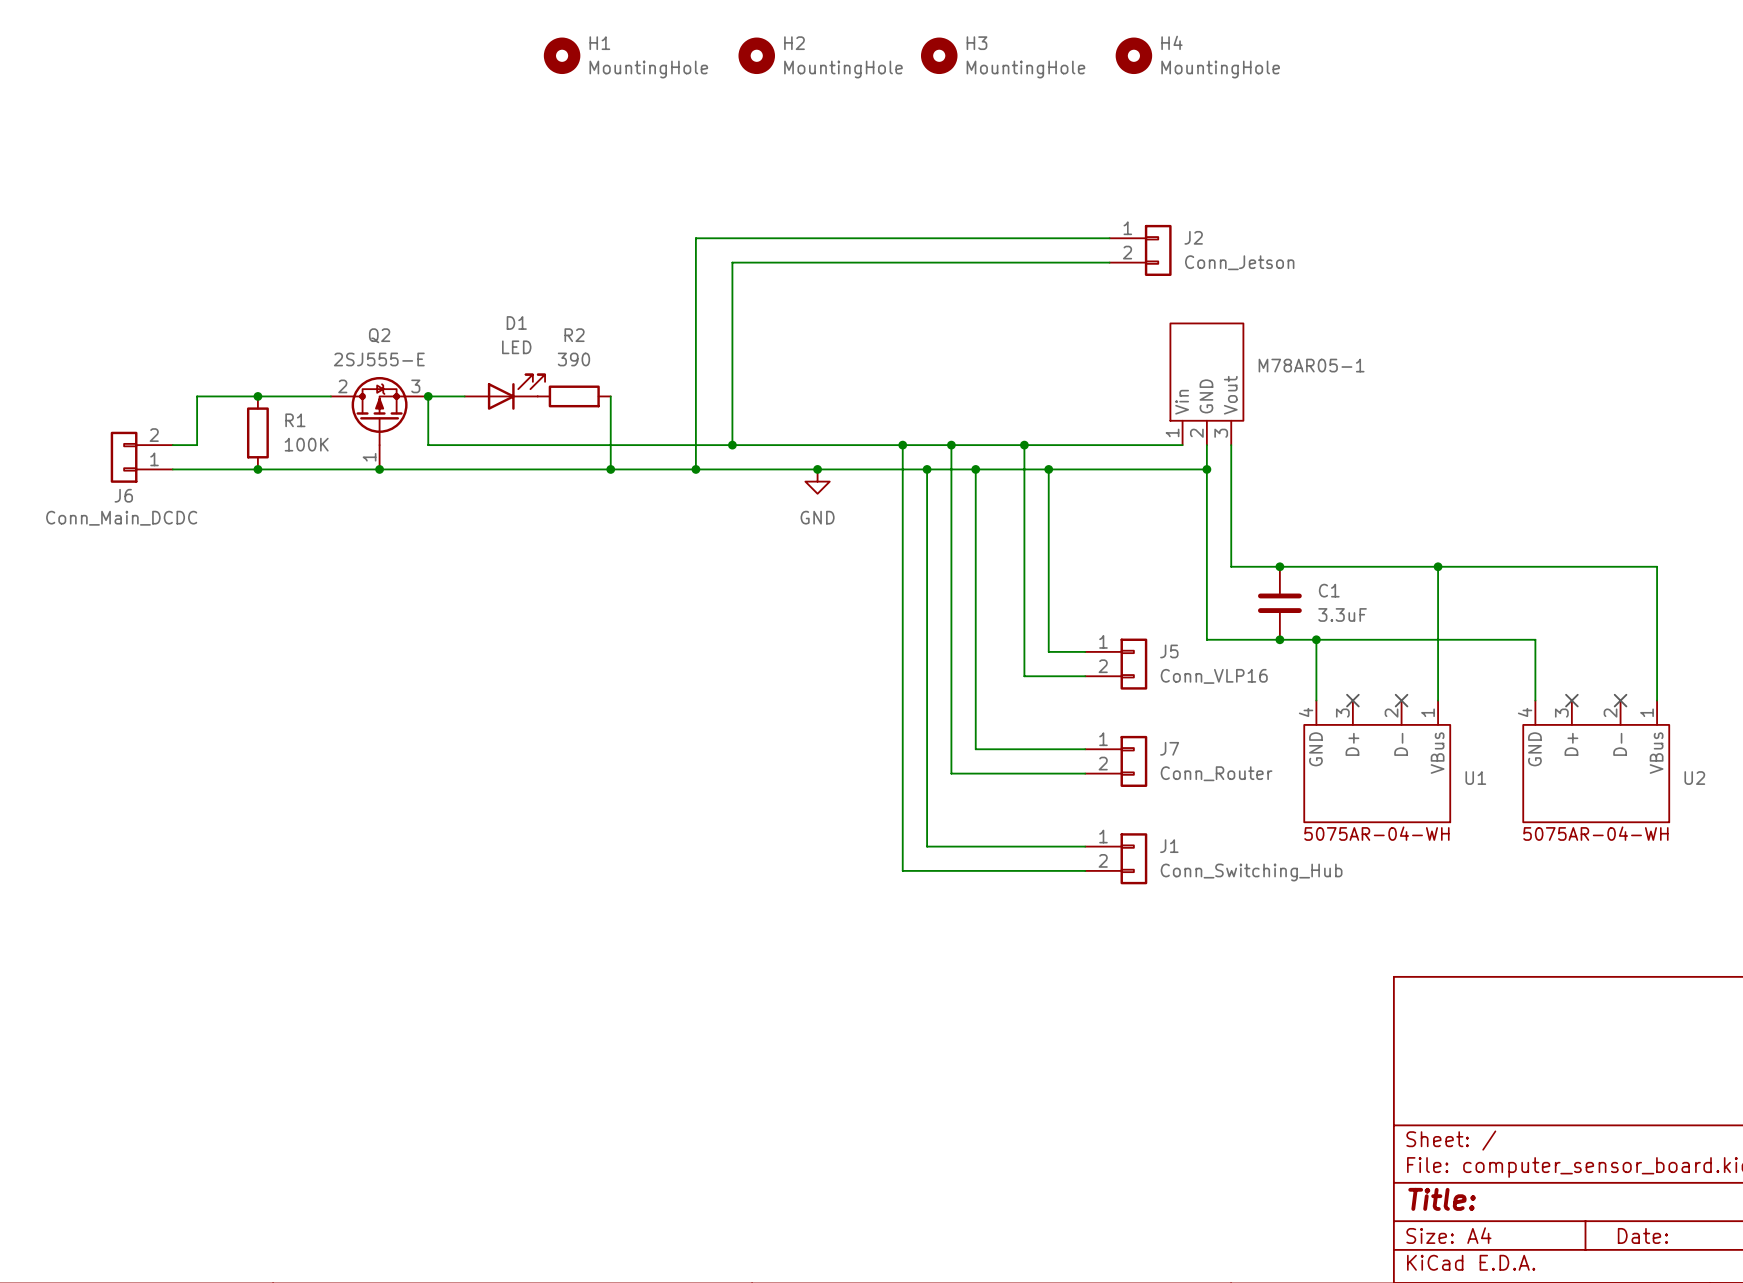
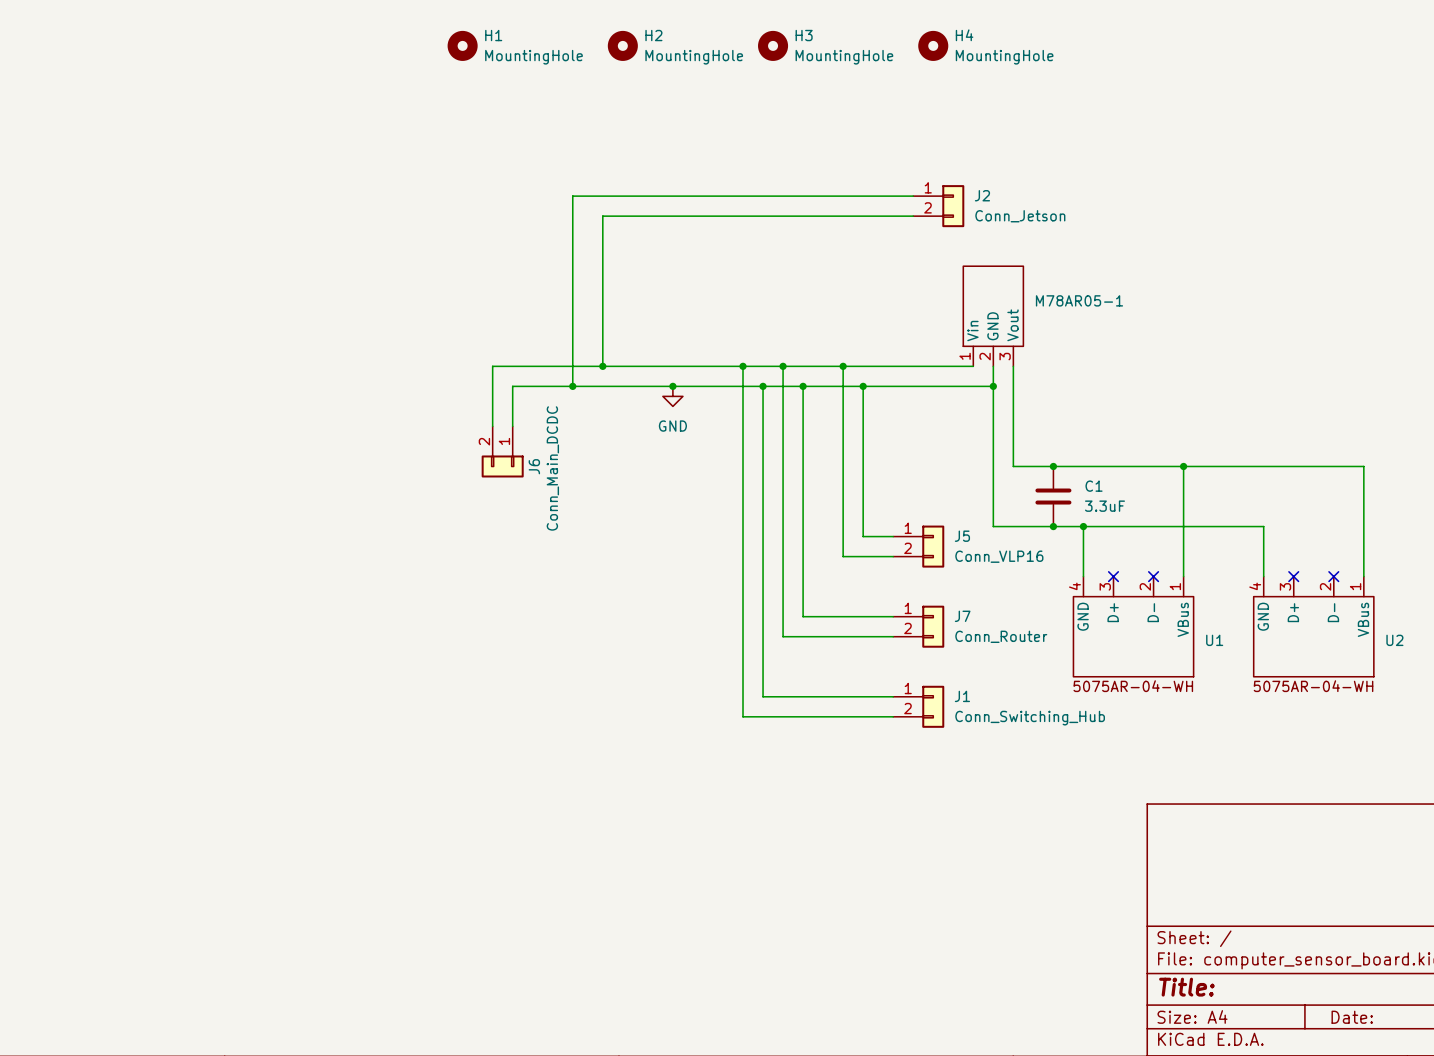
D1: LED (504, 392) -> none
junction: (257, 396) -> none
wire: (330, 396) (197, 396) (197, 445) (172, 445) -> none
junction: (428, 396) -> none
wire: (464, 396) (428, 396) (428, 445) (598, 445) -> (492, 426) (492, 366)
R2: 390 (574, 396) -> none
wire: (610, 396) (610, 469) -> none
Q2: 2SJ555-E (379, 423) -> none
R1: 100K (257, 432) -> none
J6 rotation: 0° (124, 457) -> 90° counterclockwise (502, 466)
J6 position: (141, 457) -> (502, 451)
wire: (172, 469) (622, 469) -> (512, 426) (512, 386)
junction: (257, 469) -> none
junction: (379, 469) -> none
junction: (610, 469) -> none

